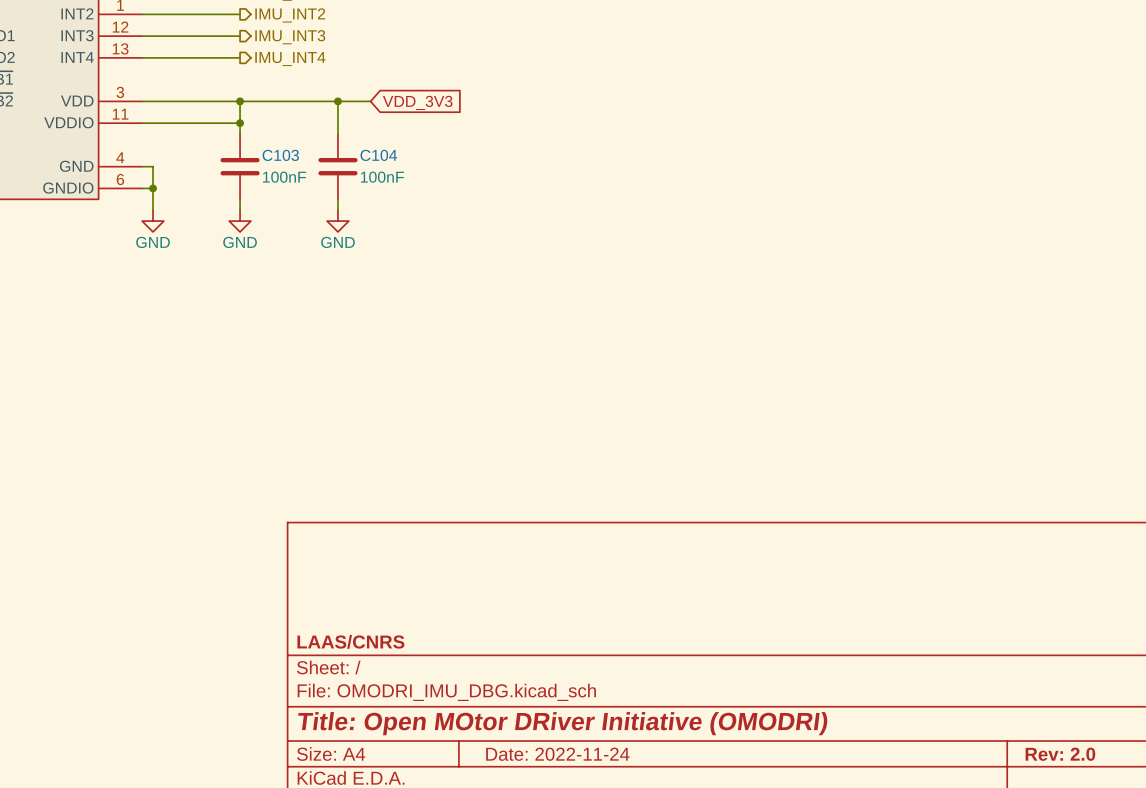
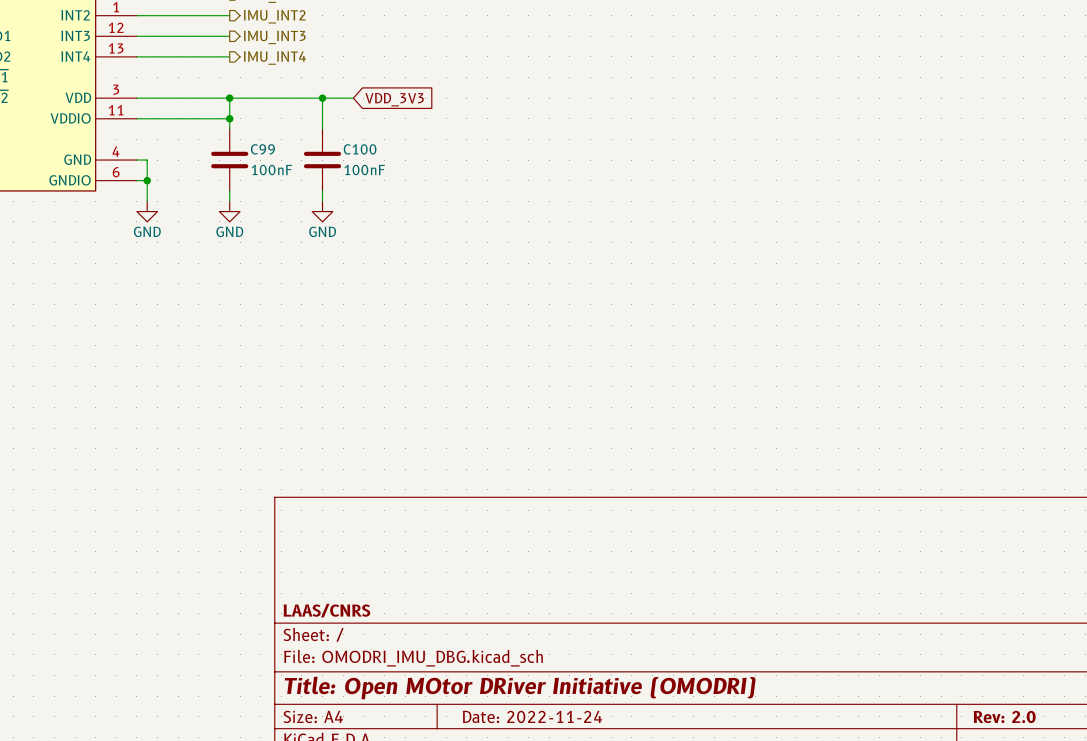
C103 name: C103 (280, 155) -> C99 (262, 149)
C104 name: C104 (378, 155) -> C100 (360, 149)

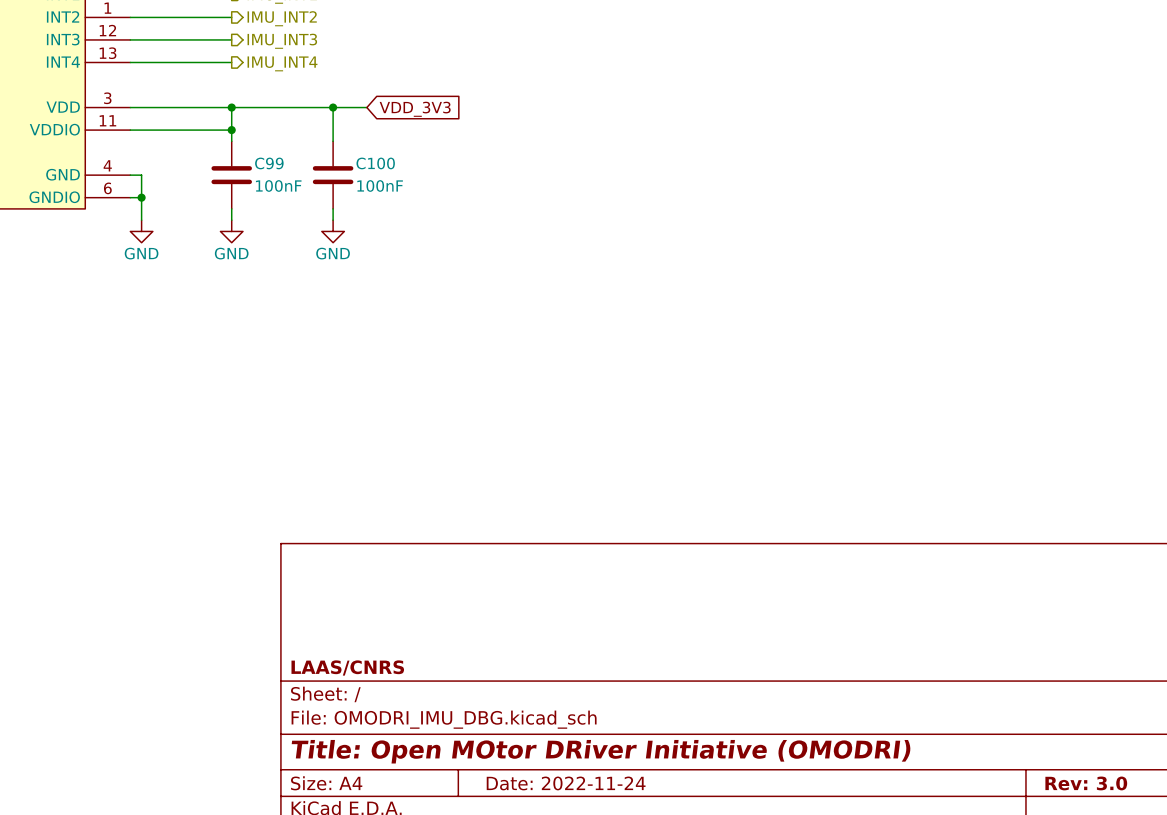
title block: Rev: 2.0 (1004, 716) -> Rev: 3.0 (1086, 783)

